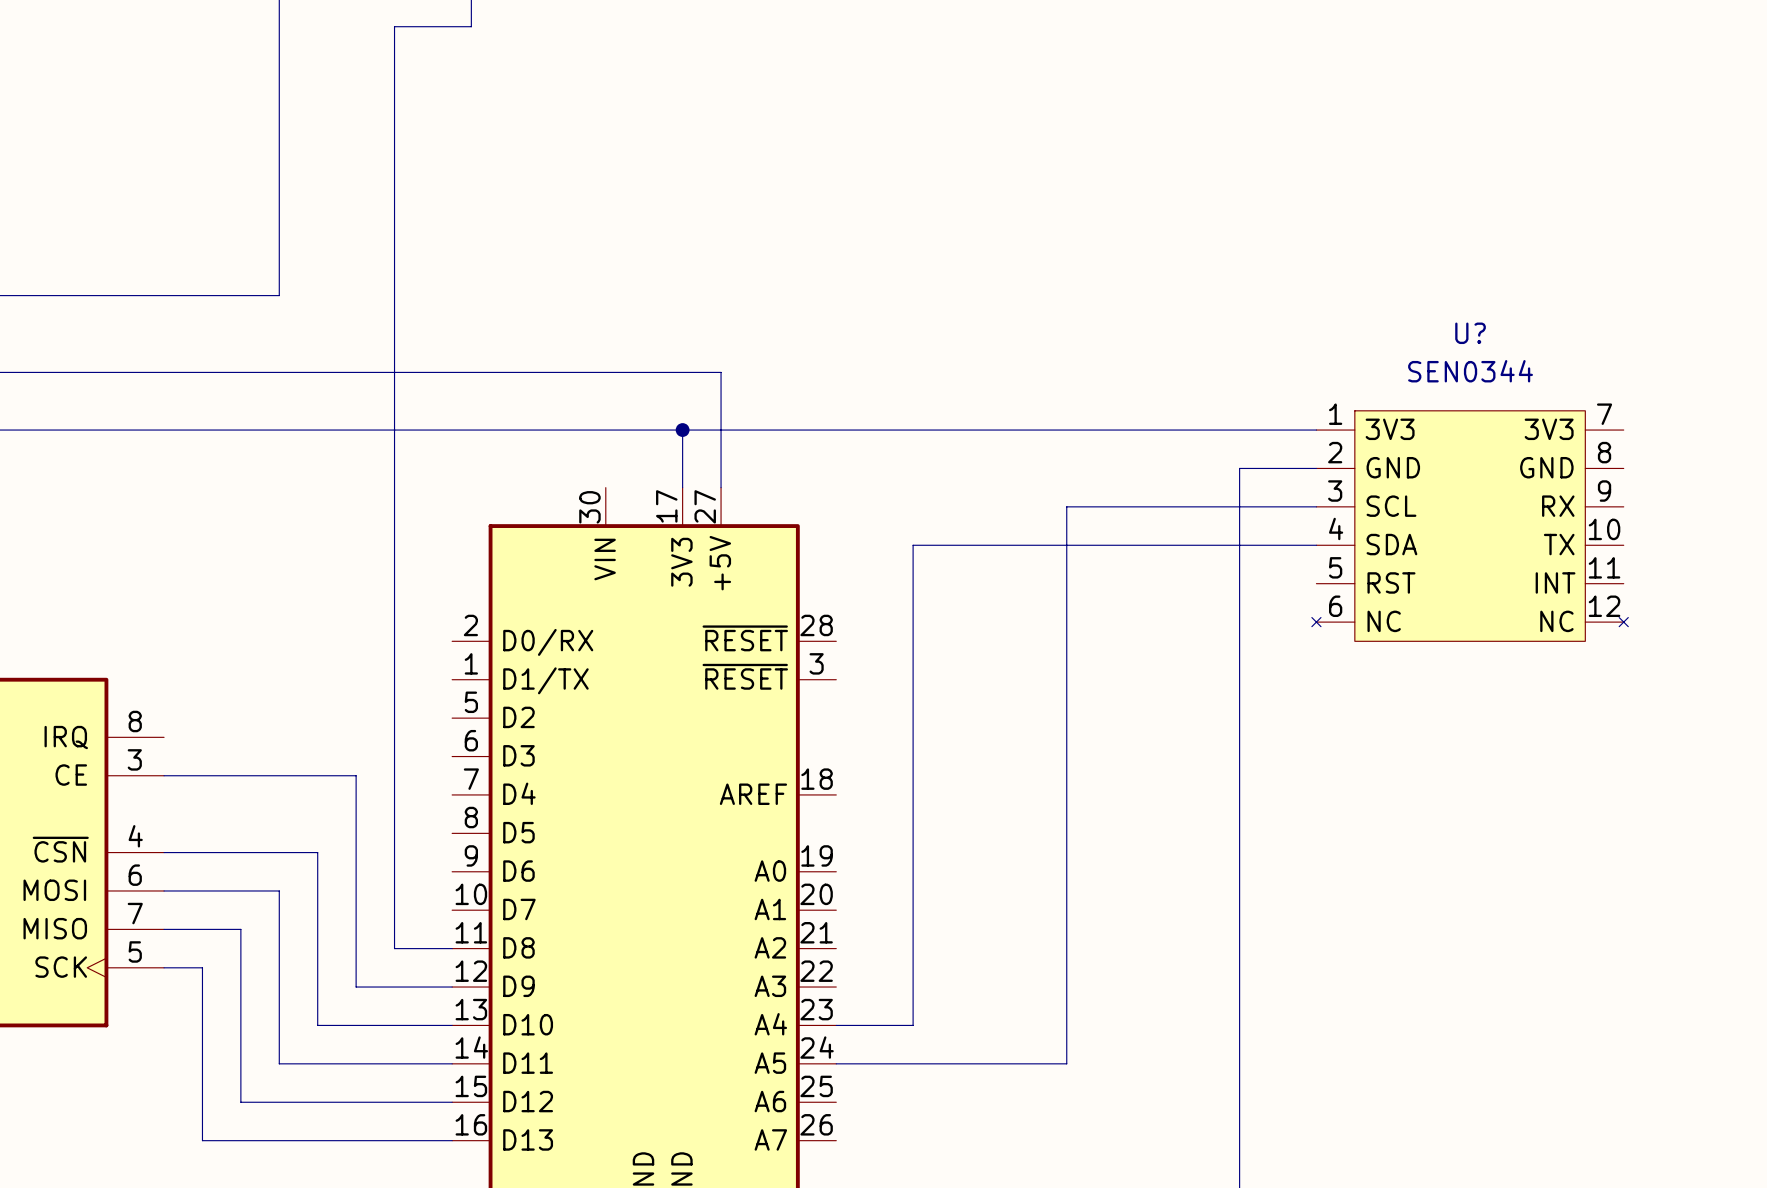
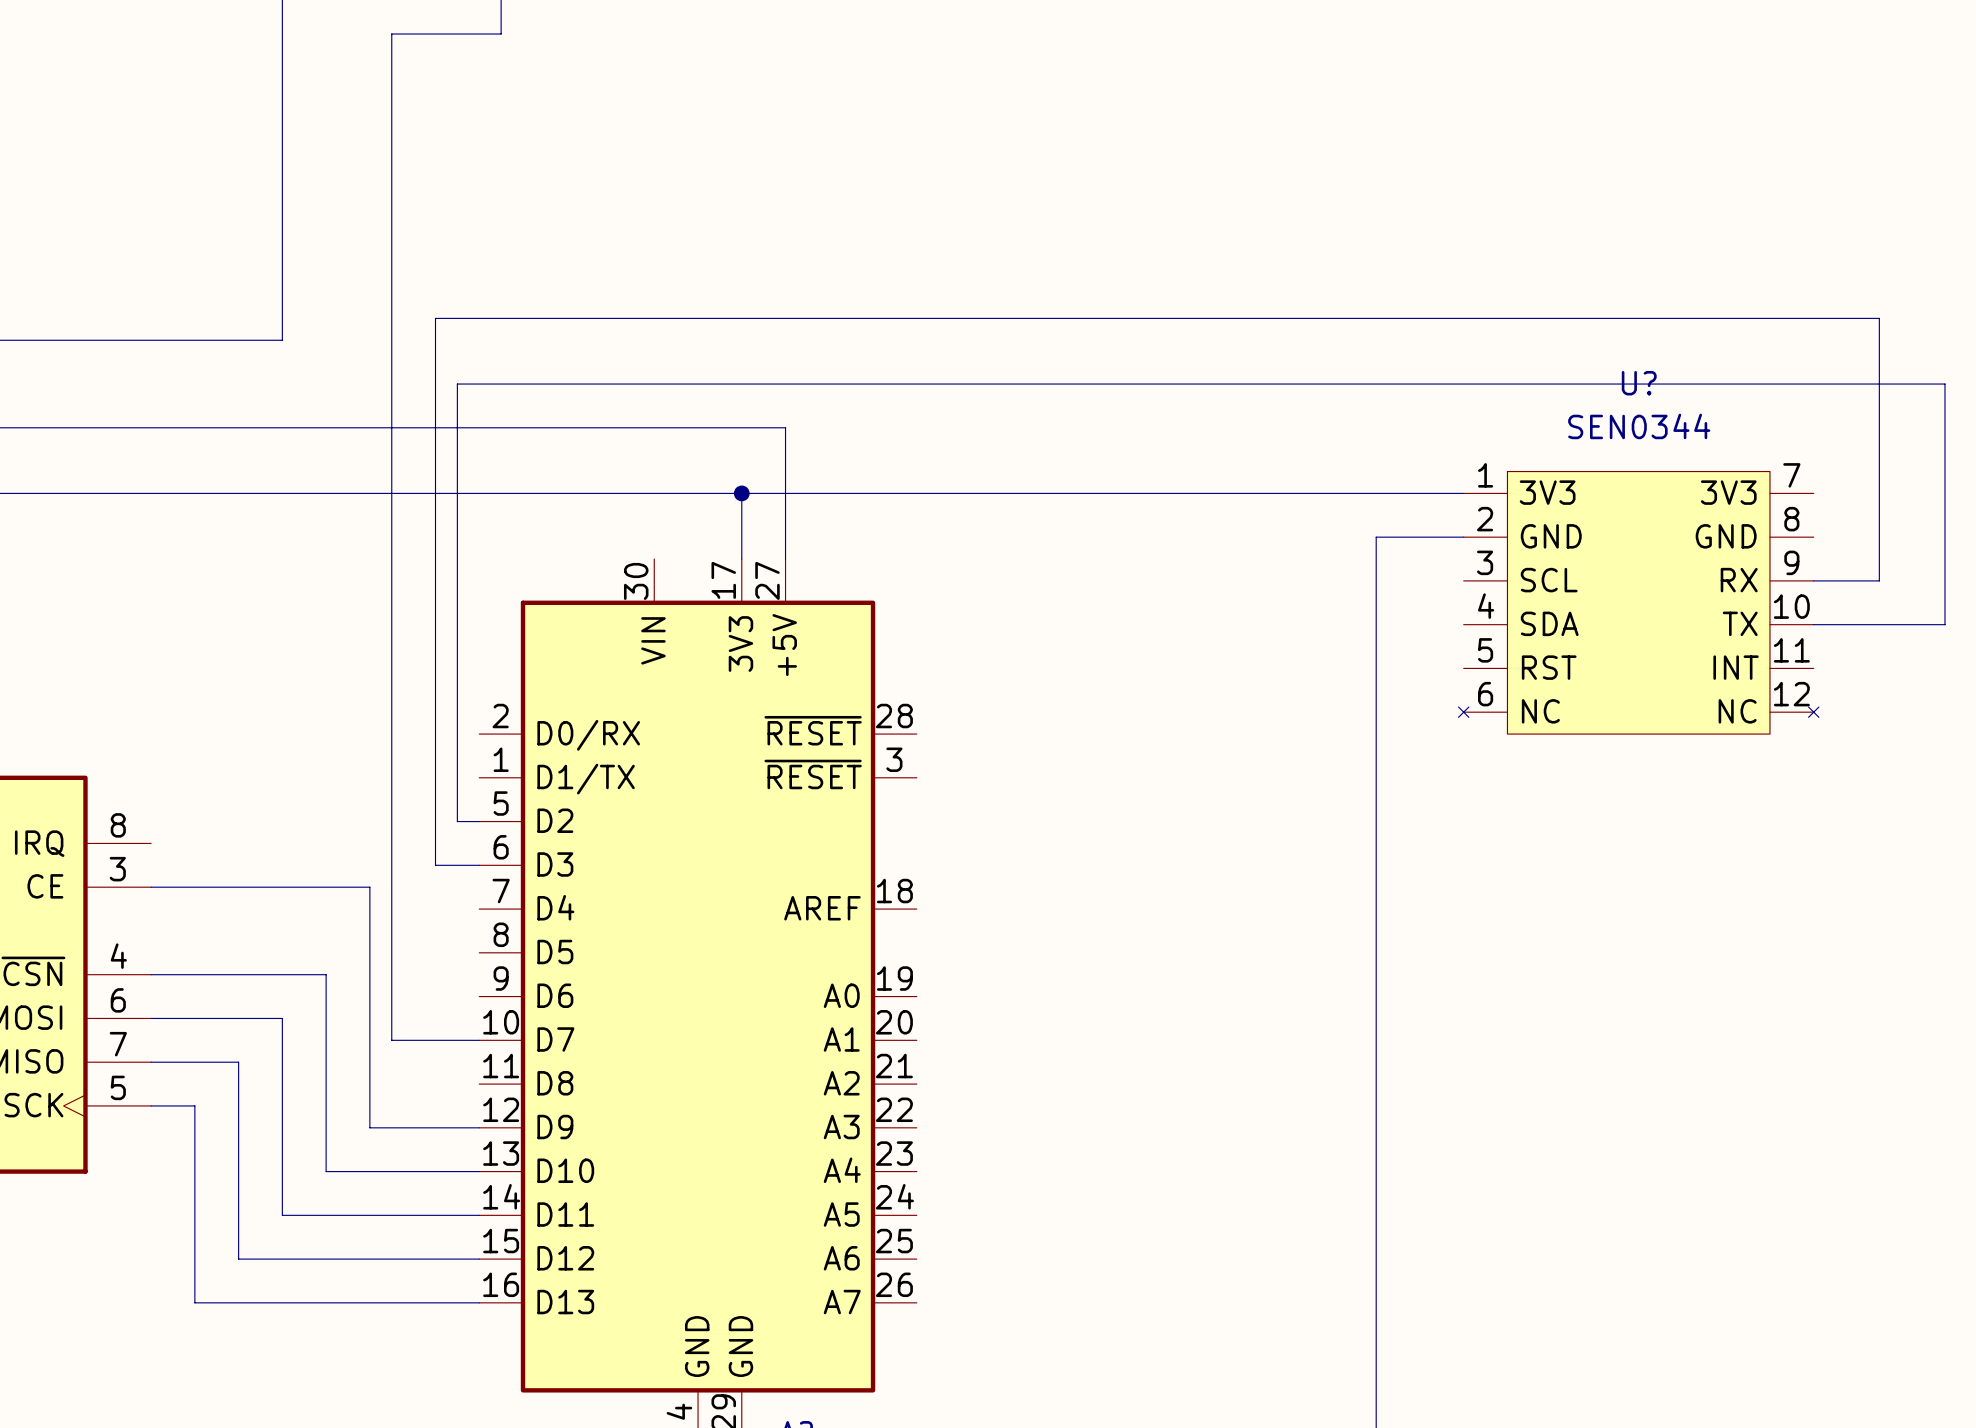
wire: (394, 26) (394, 948) (452, 948) -> (413, 34) (391, 34) (391, 1040) (479, 1040)
wire: (1316, 506) (1066, 506) (1066, 1063) (836, 1063) -> none
wire: none -> (1813, 580) (1879, 580) (1879, 318) (435, 318) (435, 865) (479, 865)
wire: (1316, 545) (913, 545) (913, 1025) (836, 1025) -> none
wire: none -> (1813, 624) (1944, 624) (1944, 384) (457, 384) (457, 821) (479, 821)

